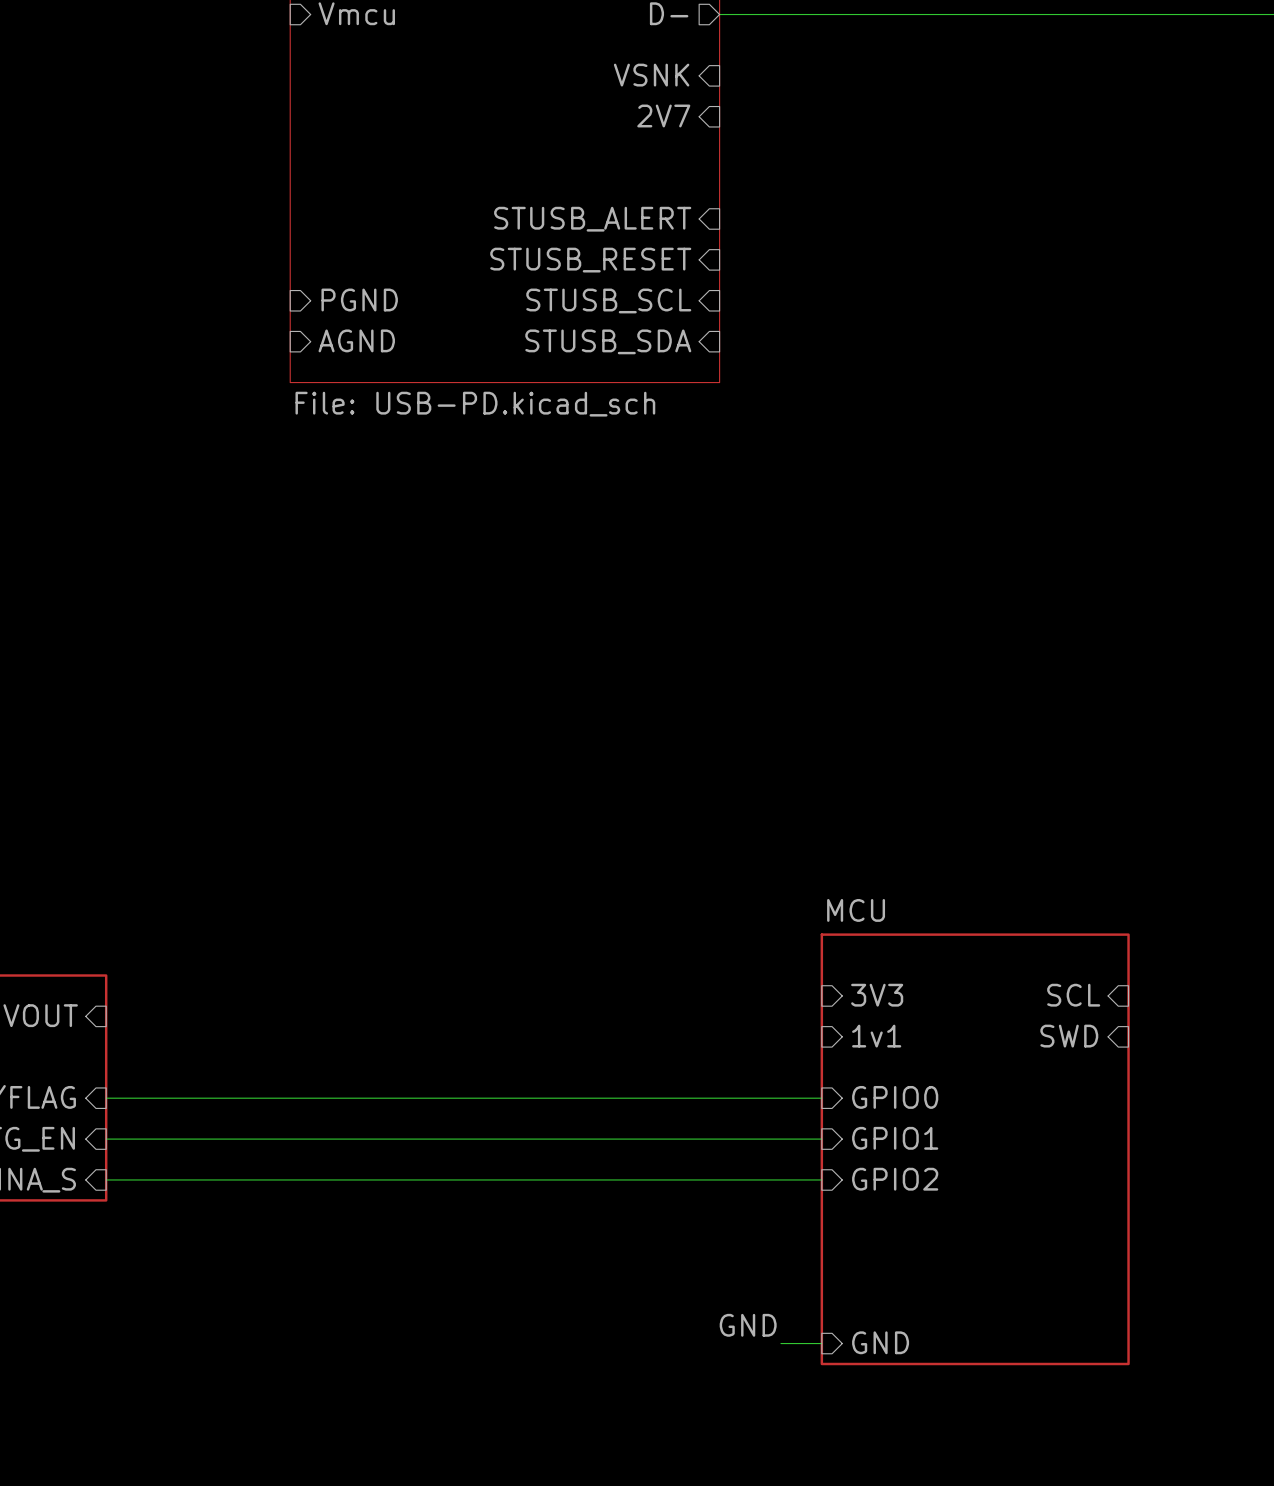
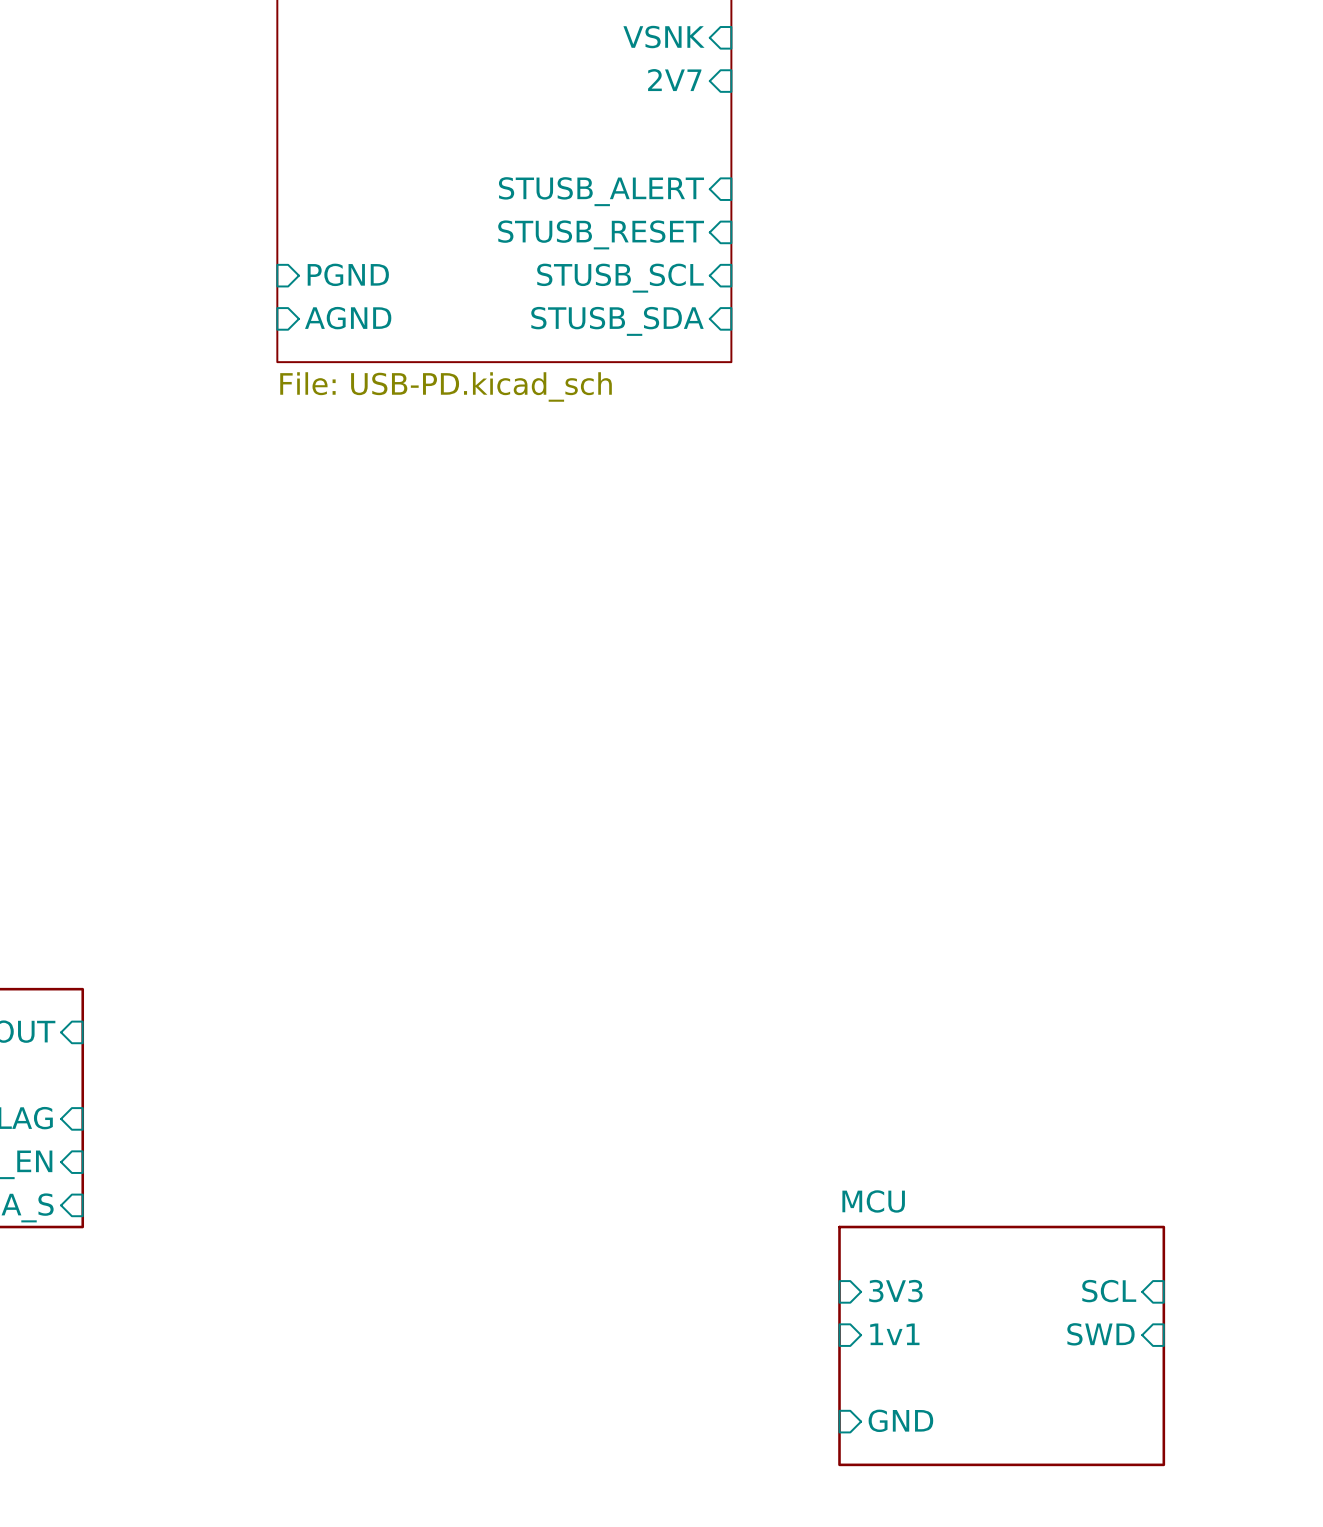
sheet pin position: 3V3 (877, 995) -> 3V3 (895, 1291)
sheet pin position: SCL (1073, 995) -> SCL (1109, 1291)
sheet pin position: 1v1 (876, 1036) -> 1v1 (894, 1334)
sheet pin position: SWD (1069, 1036) -> SWD (1100, 1334)
sheet pin: GPIO0 (895, 1097) -> none
wire: (106, 1098) (821, 1098) -> none
sheet pin: GPIO1 (895, 1138) -> none
wire: (106, 1139) (821, 1139) -> none
sheet MCU: (975, 1149) -> none
wire: (106, 1179) (821, 1179) -> none
sheet pin: GPIO2 (895, 1179) -> none
sheet MCU: none -> (1001, 1345)
label: GND (748, 1325) -> none
sheet pin position: GND (880, 1342) -> GND (900, 1420)
wire: (780, 1343) (821, 1343) -> none

